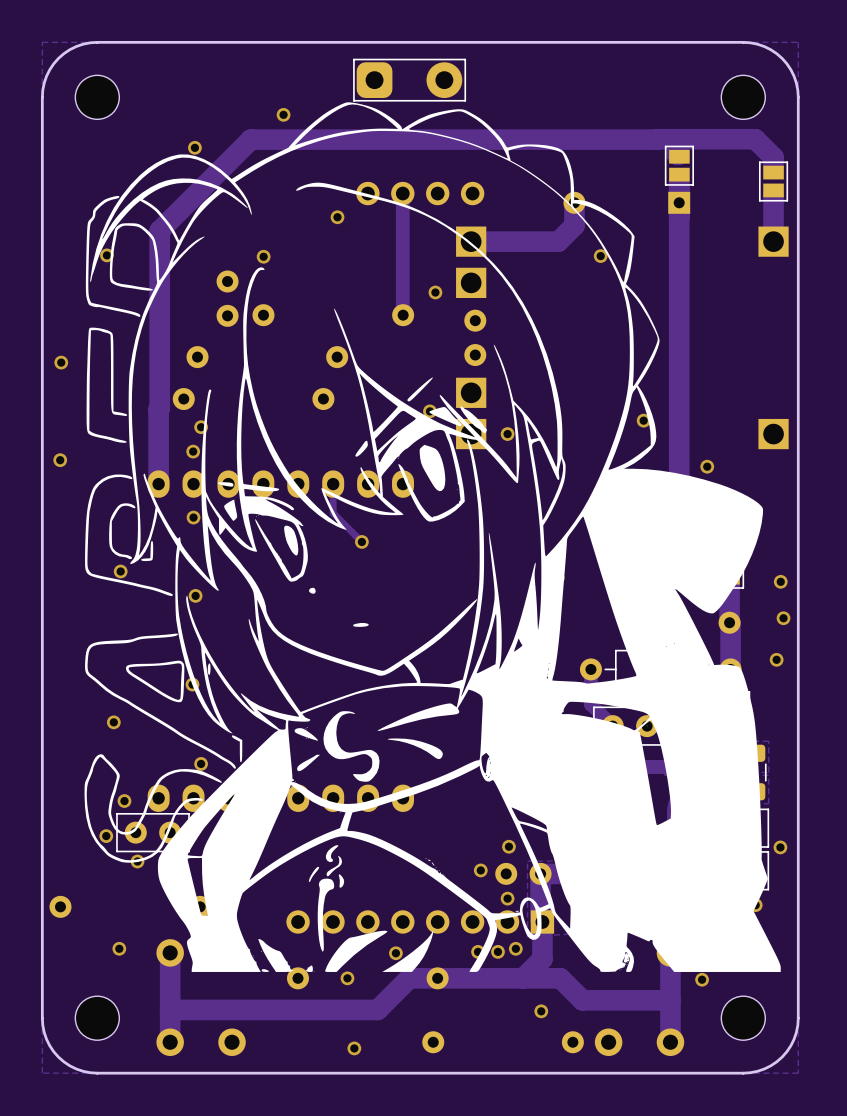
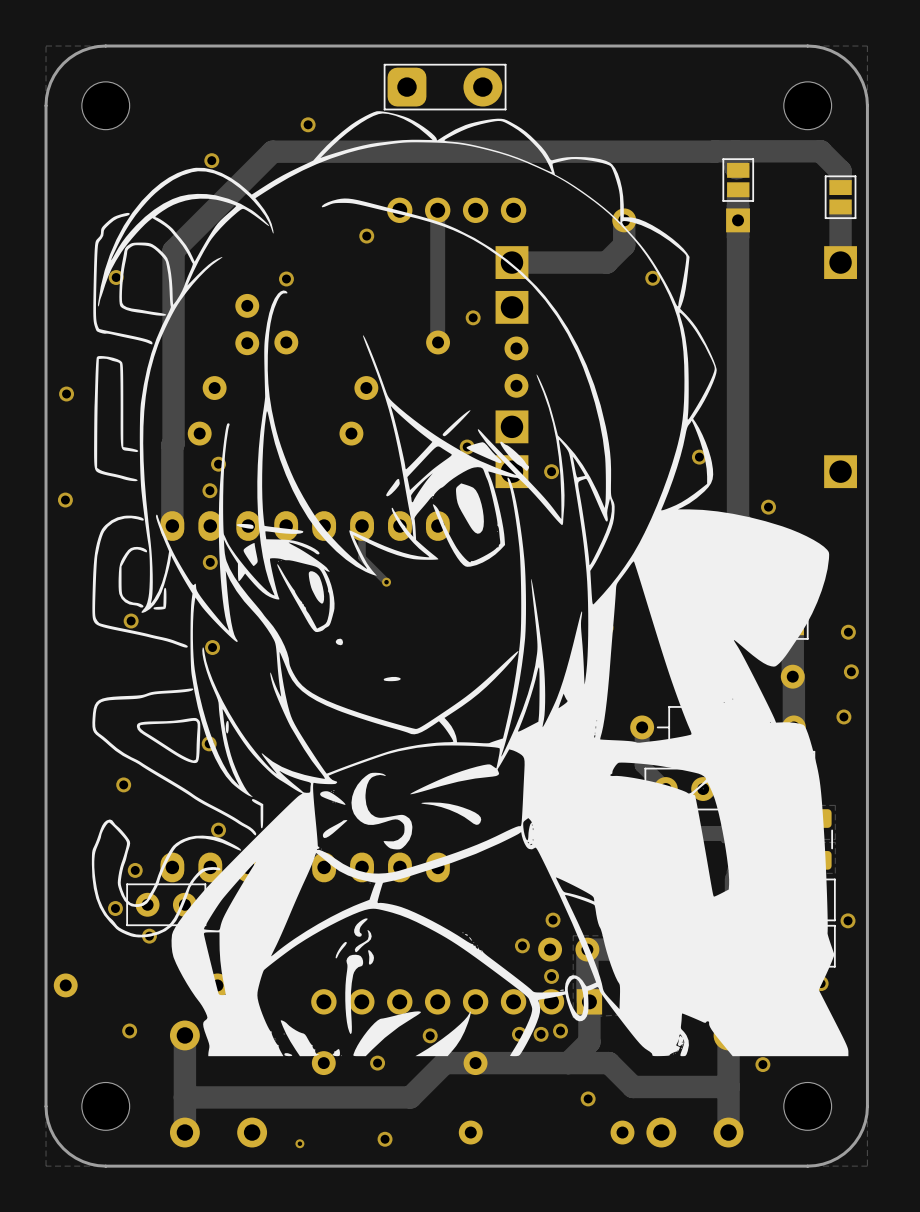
via size: [355, 535, 369, 549] -> [382, 577, 392, 587]
via: none -> (299, 1143)

